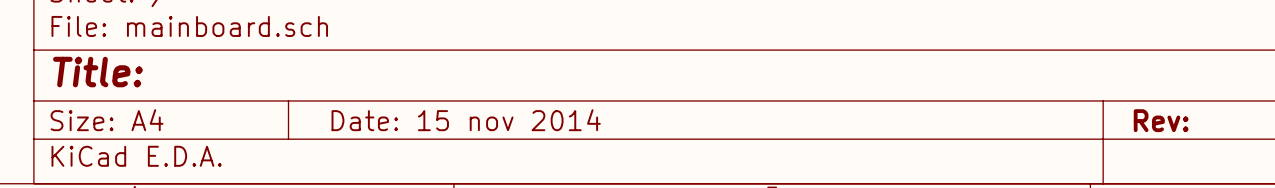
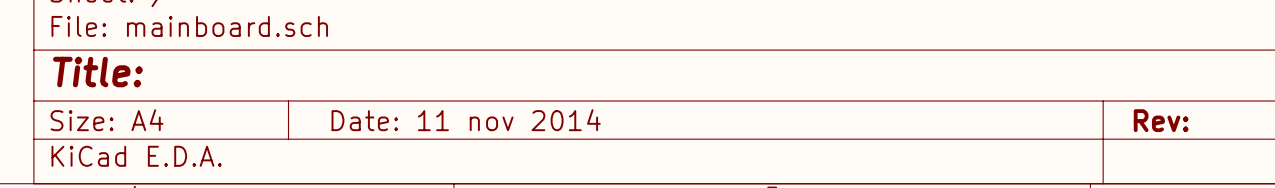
title block: Date: 15 nov 2014 (466, 120) -> Date: 11 nov 2014 (466, 120)

